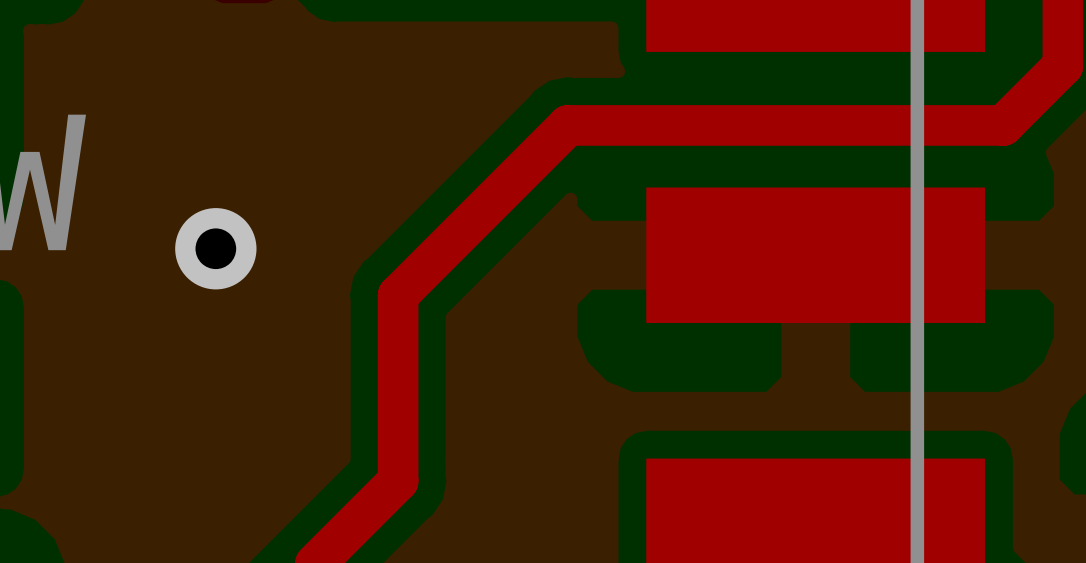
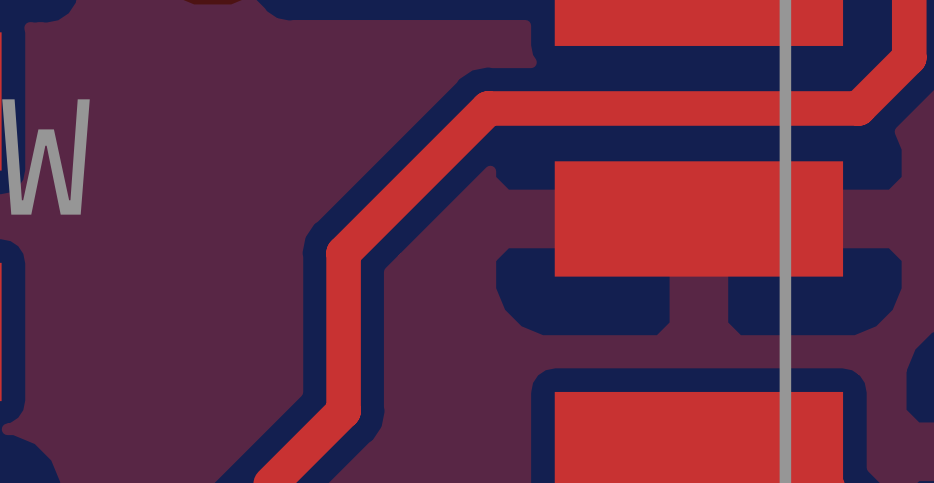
via: (215, 248) -> none

